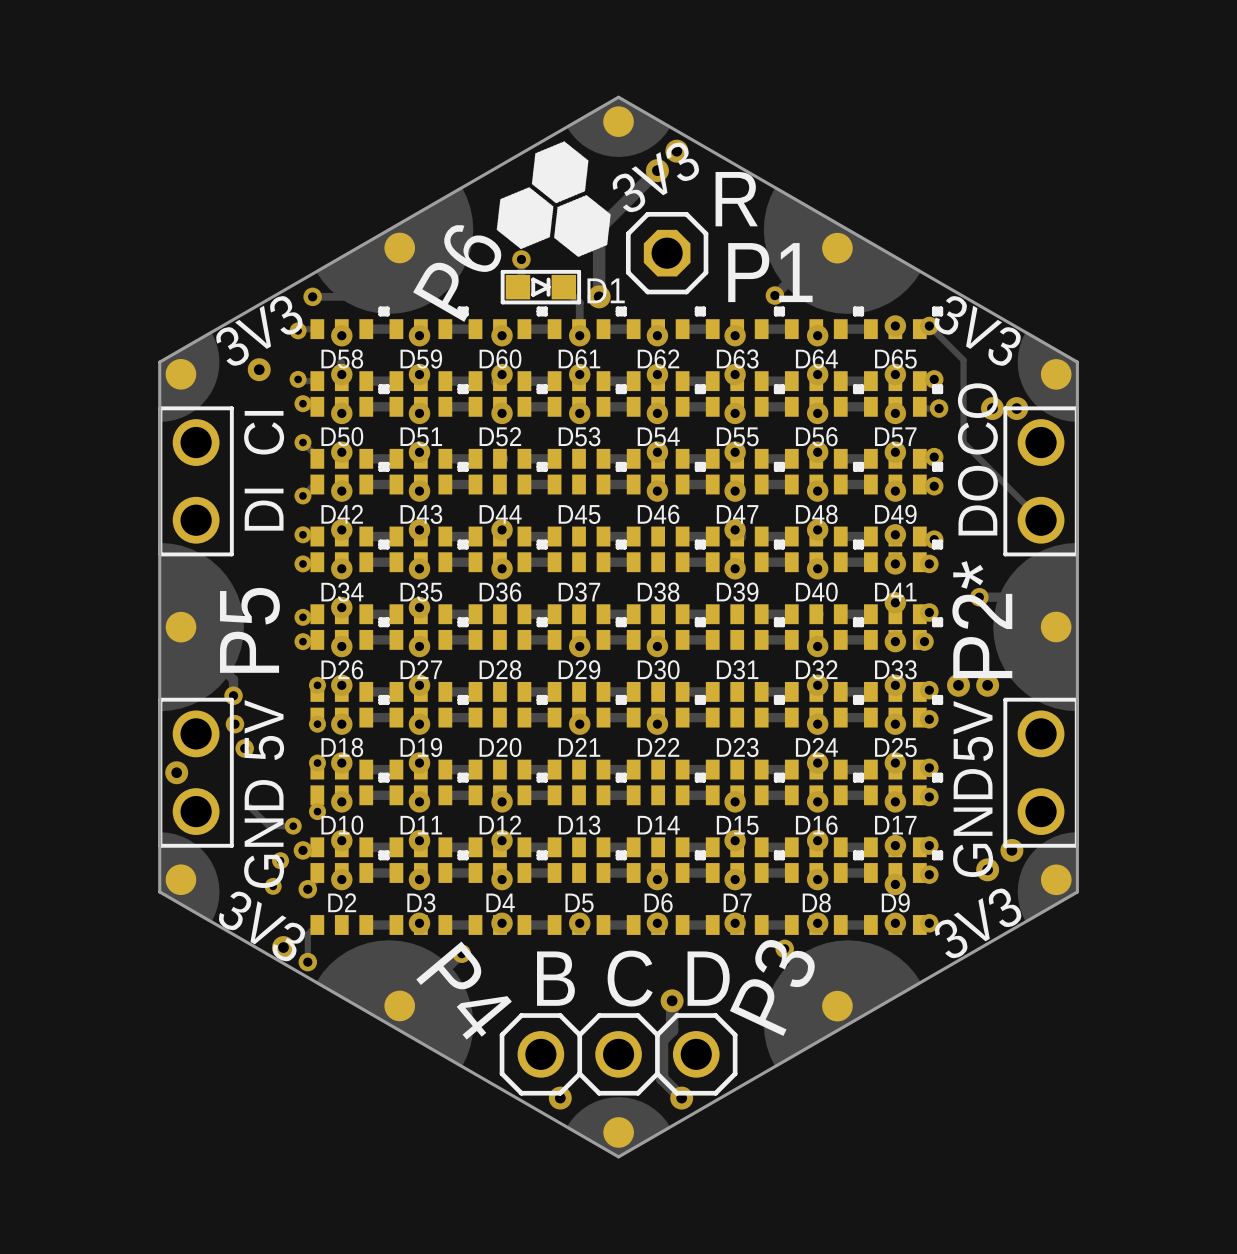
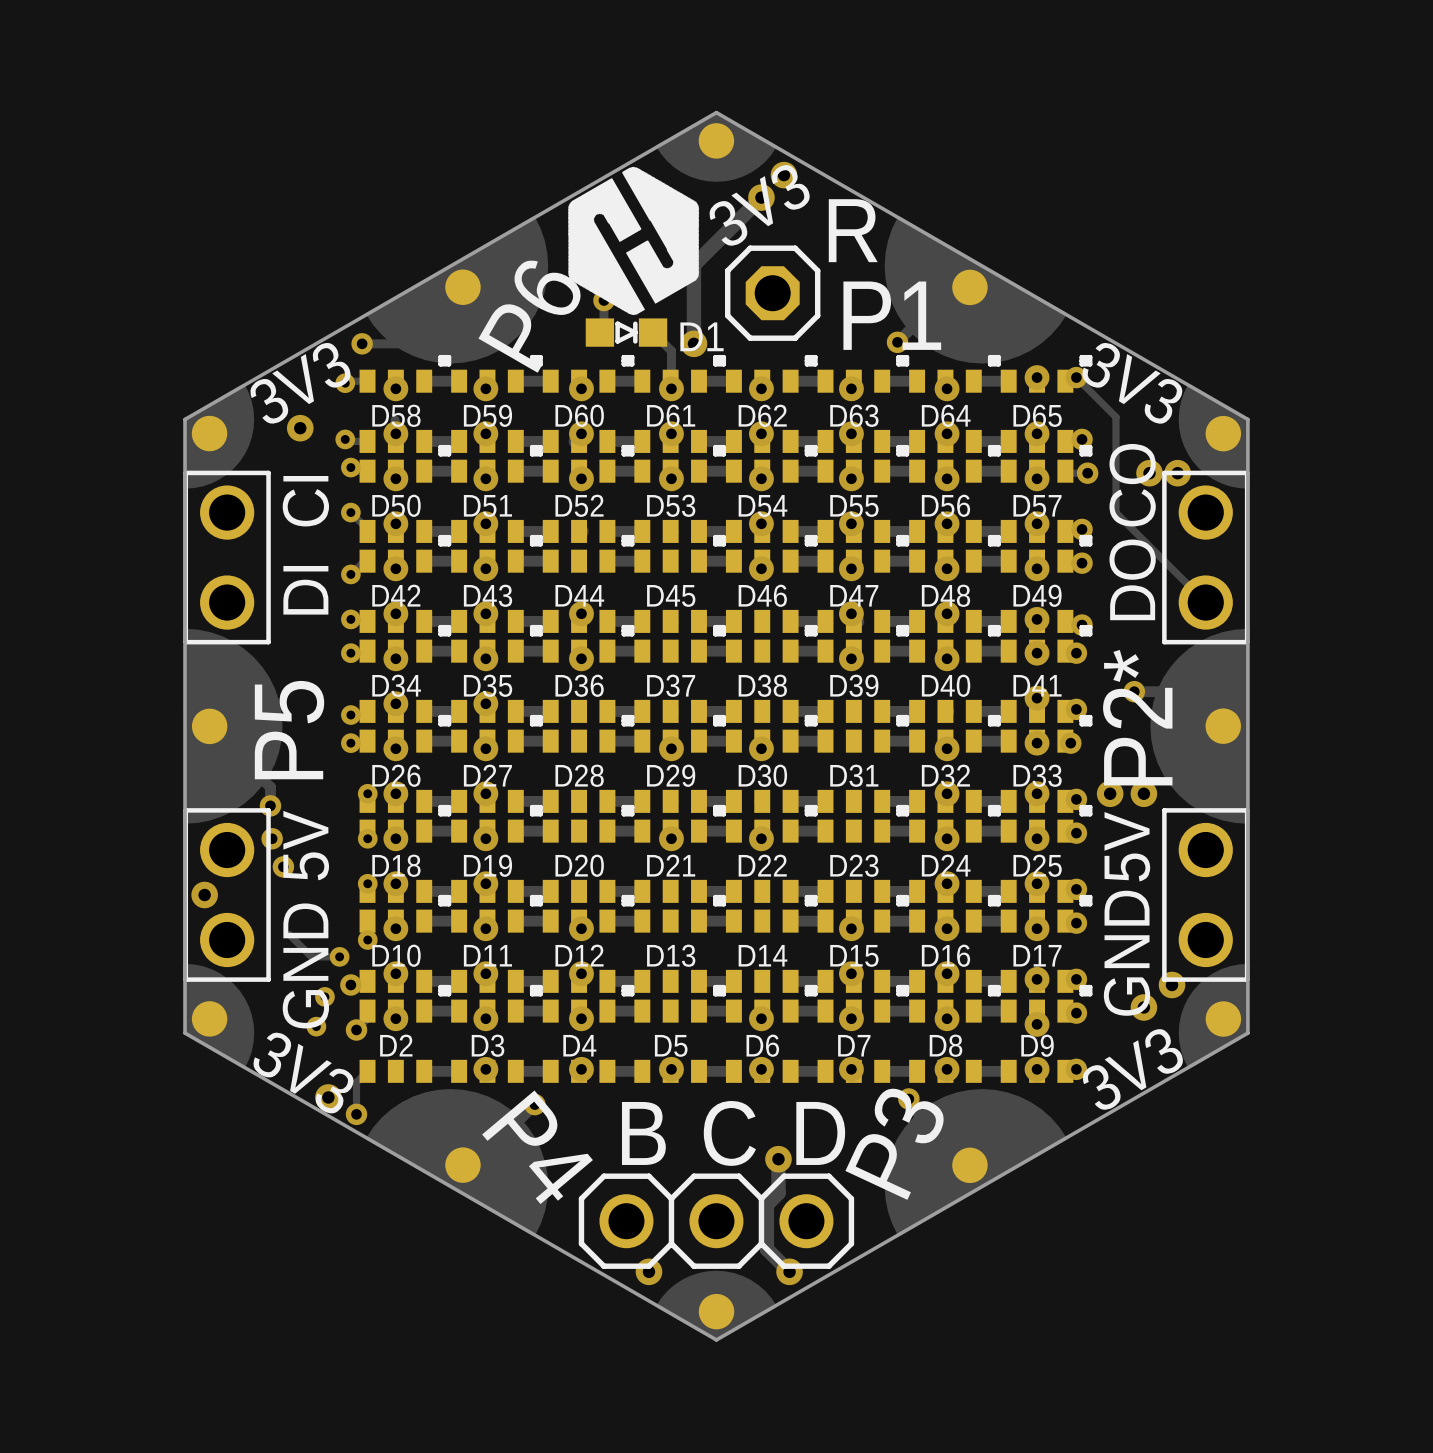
drawing: [496, 141, 611, 258] -> none
drawing: none -> [567, 166, 700, 316]
D1 footprint: [500, 269, 582, 305] -> [585, 318, 668, 347]

